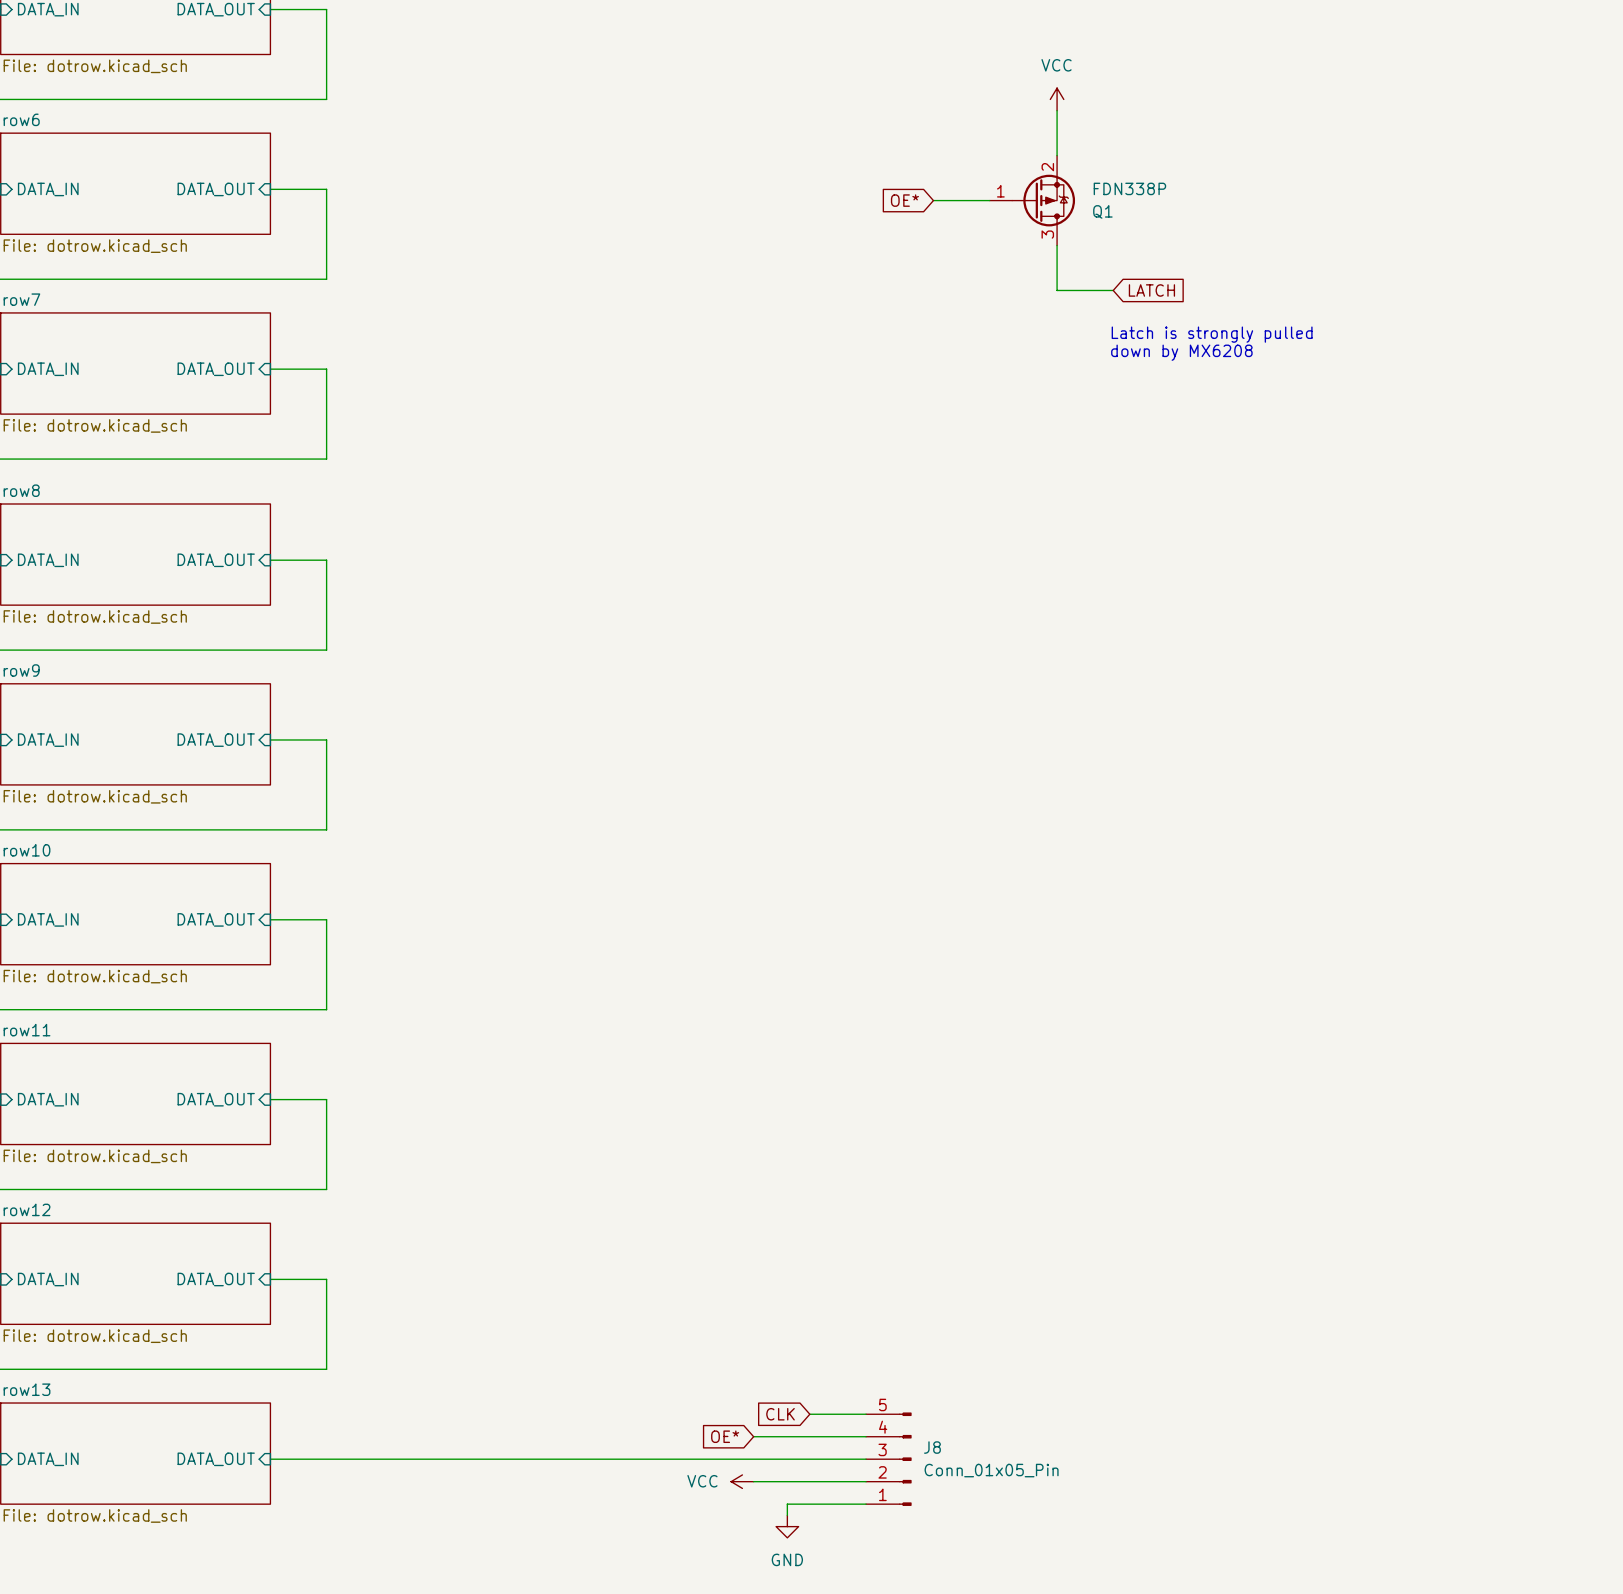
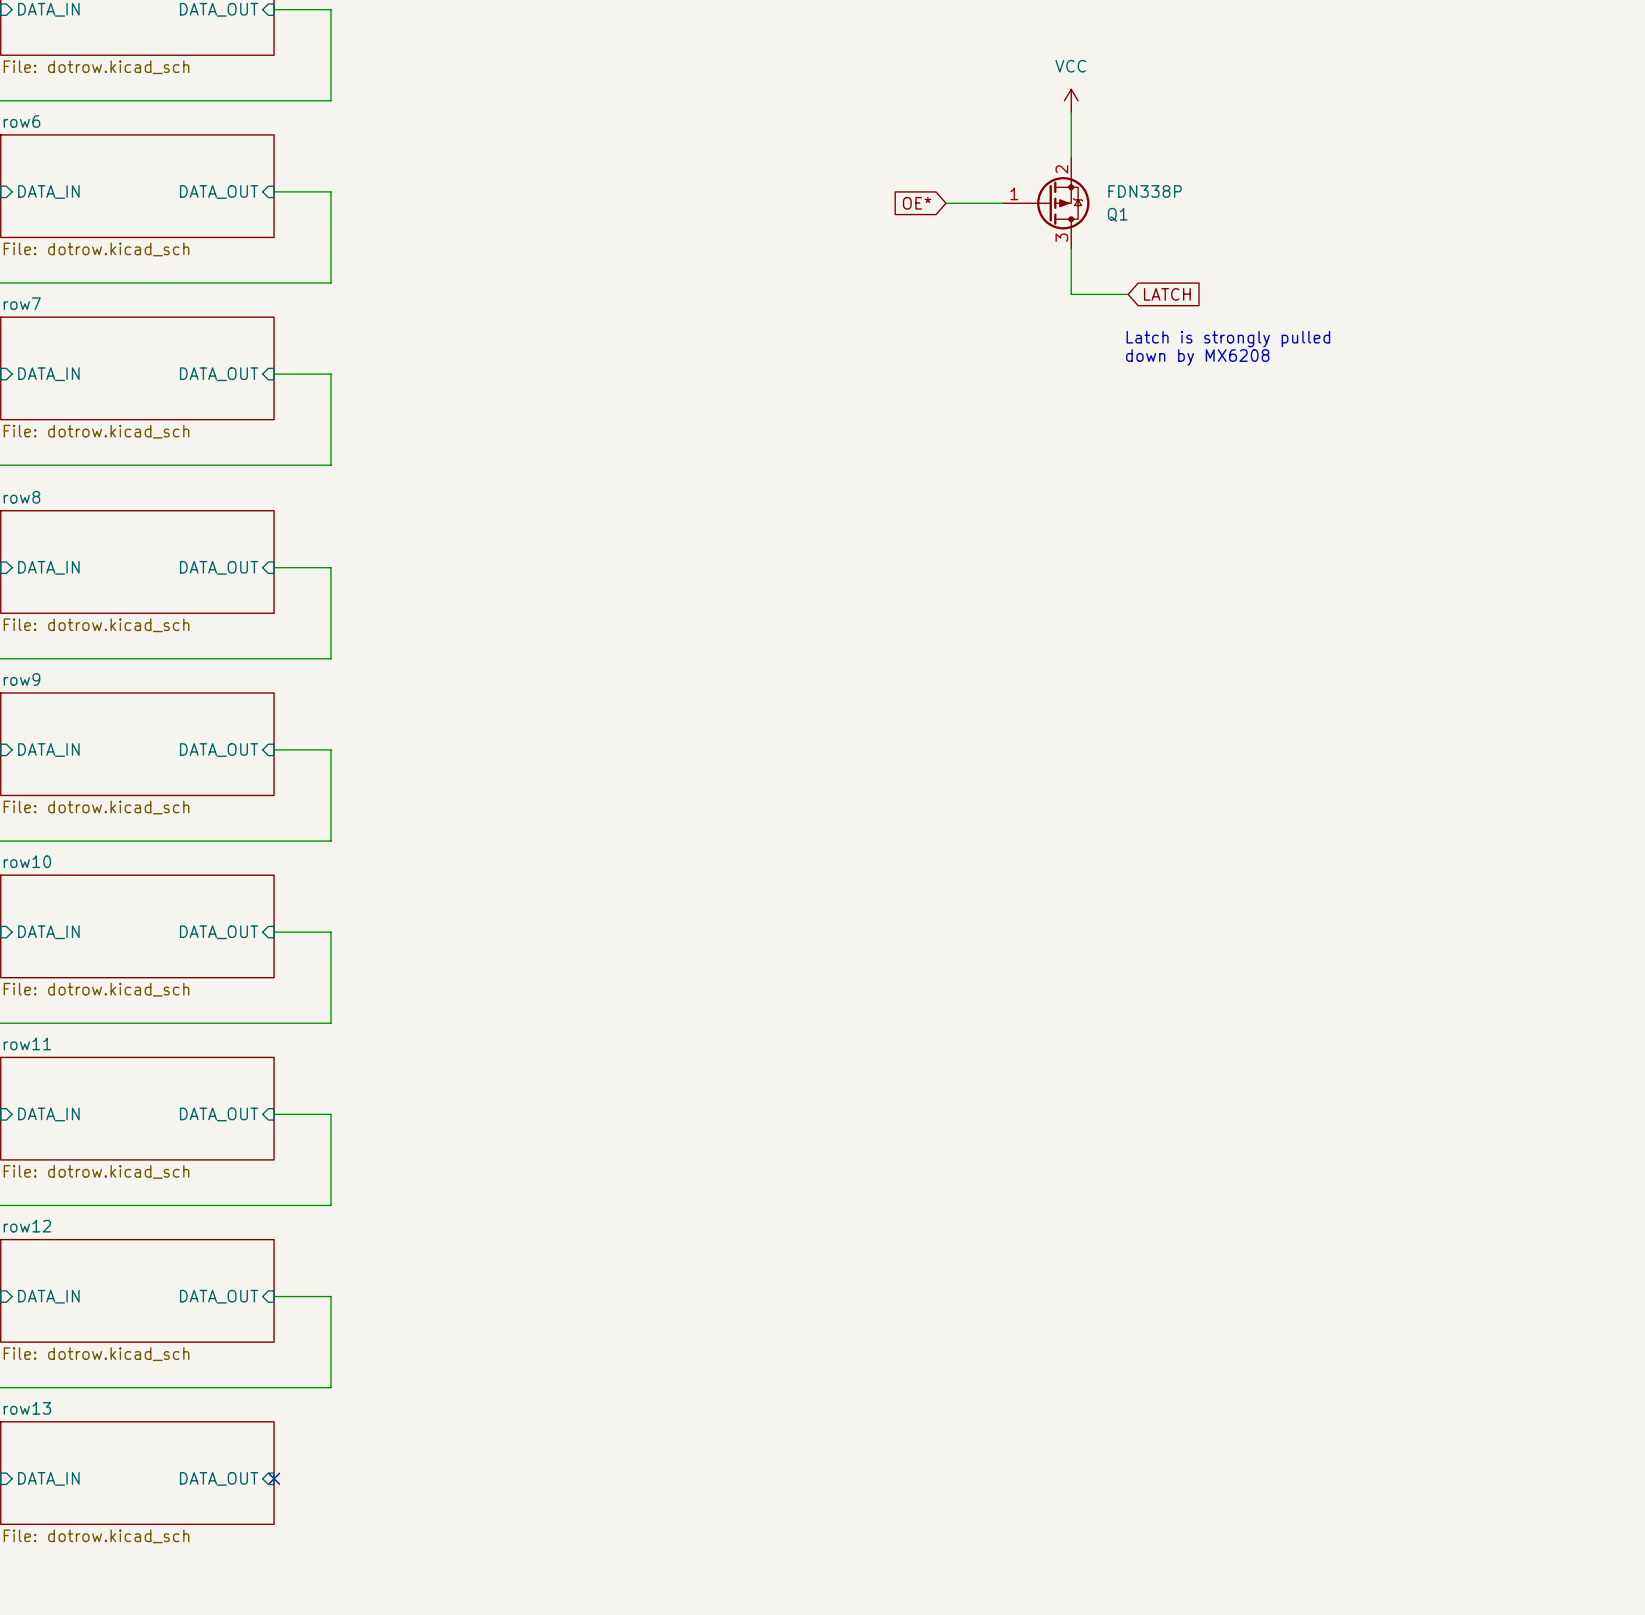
global label: CLK (780, 1414) -> none
wire: (809, 1414) (866, 1414) -> none
global label: OE* (725, 1436) -> none
wire: (753, 1436) (866, 1436) -> none
wire: (270, 1459) (866, 1459) -> none
no-connect mark: none -> (274, 1478)
J8: Conn_01x05_Pin (888, 1459) -> none
power symbol: VCC (742, 1481) -> none
wire: (753, 1481) (866, 1481) -> none
wire: (866, 1504) (787, 1504) (787, 1515) -> none
power symbol: GND (787, 1526) -> none

